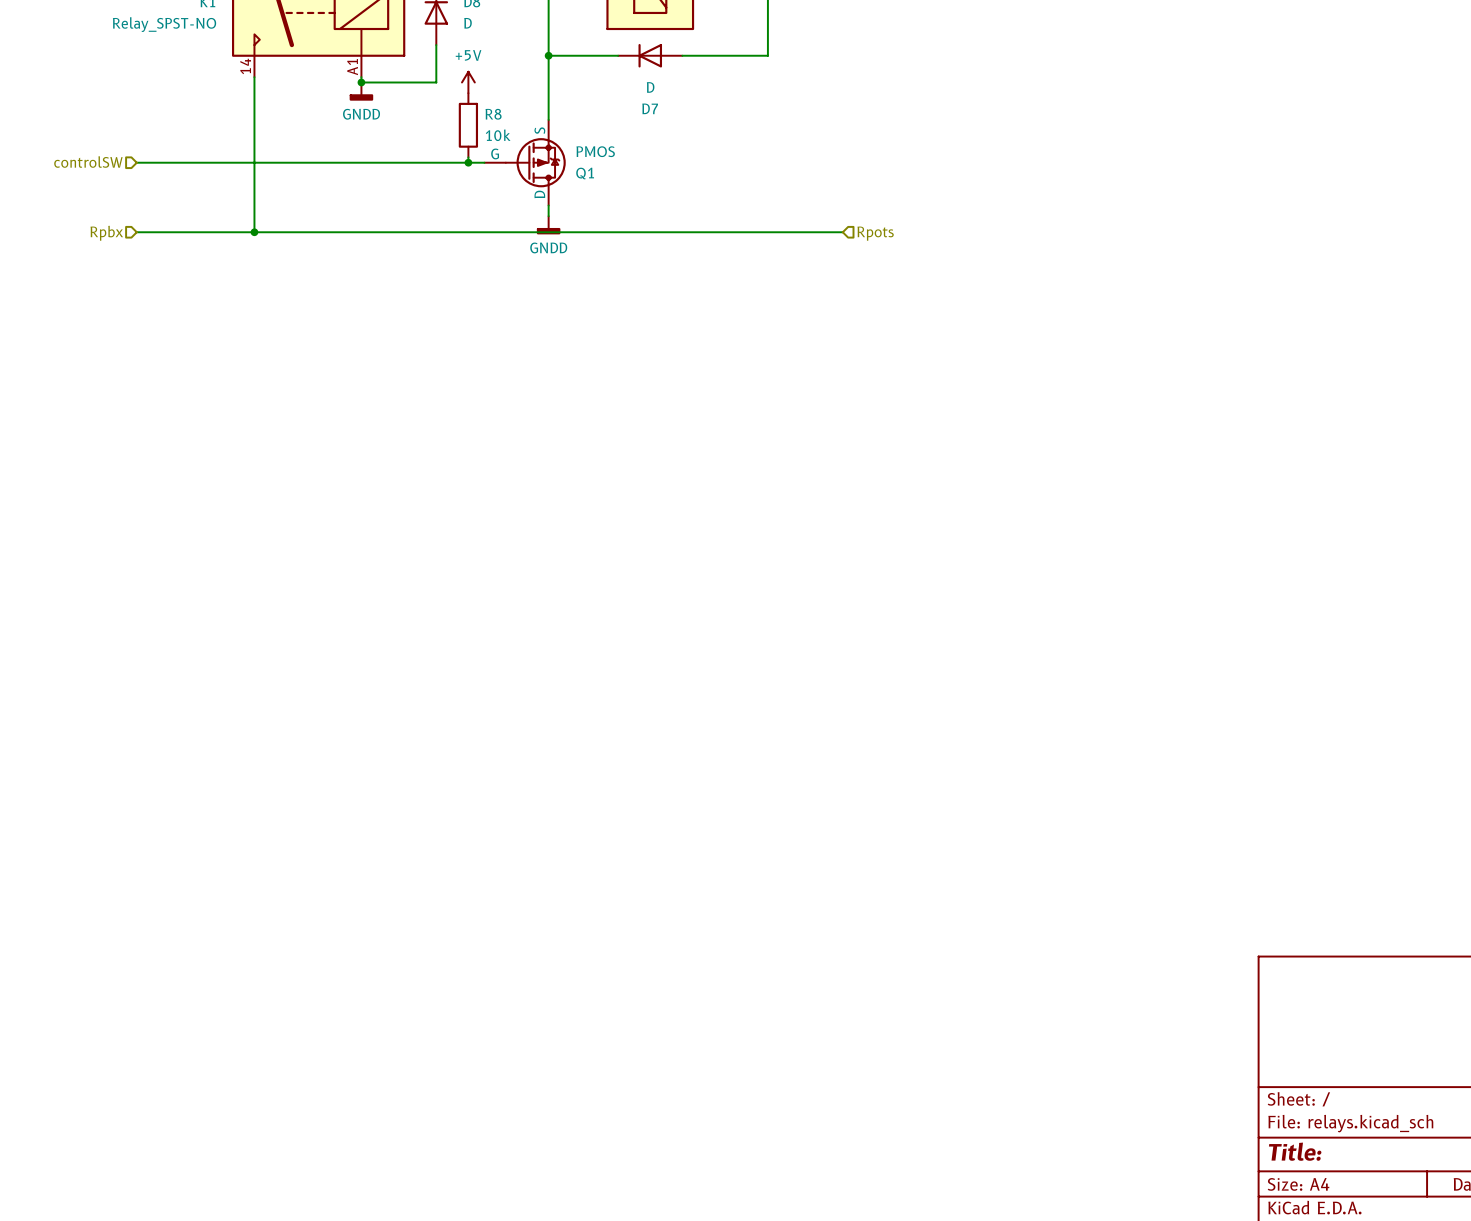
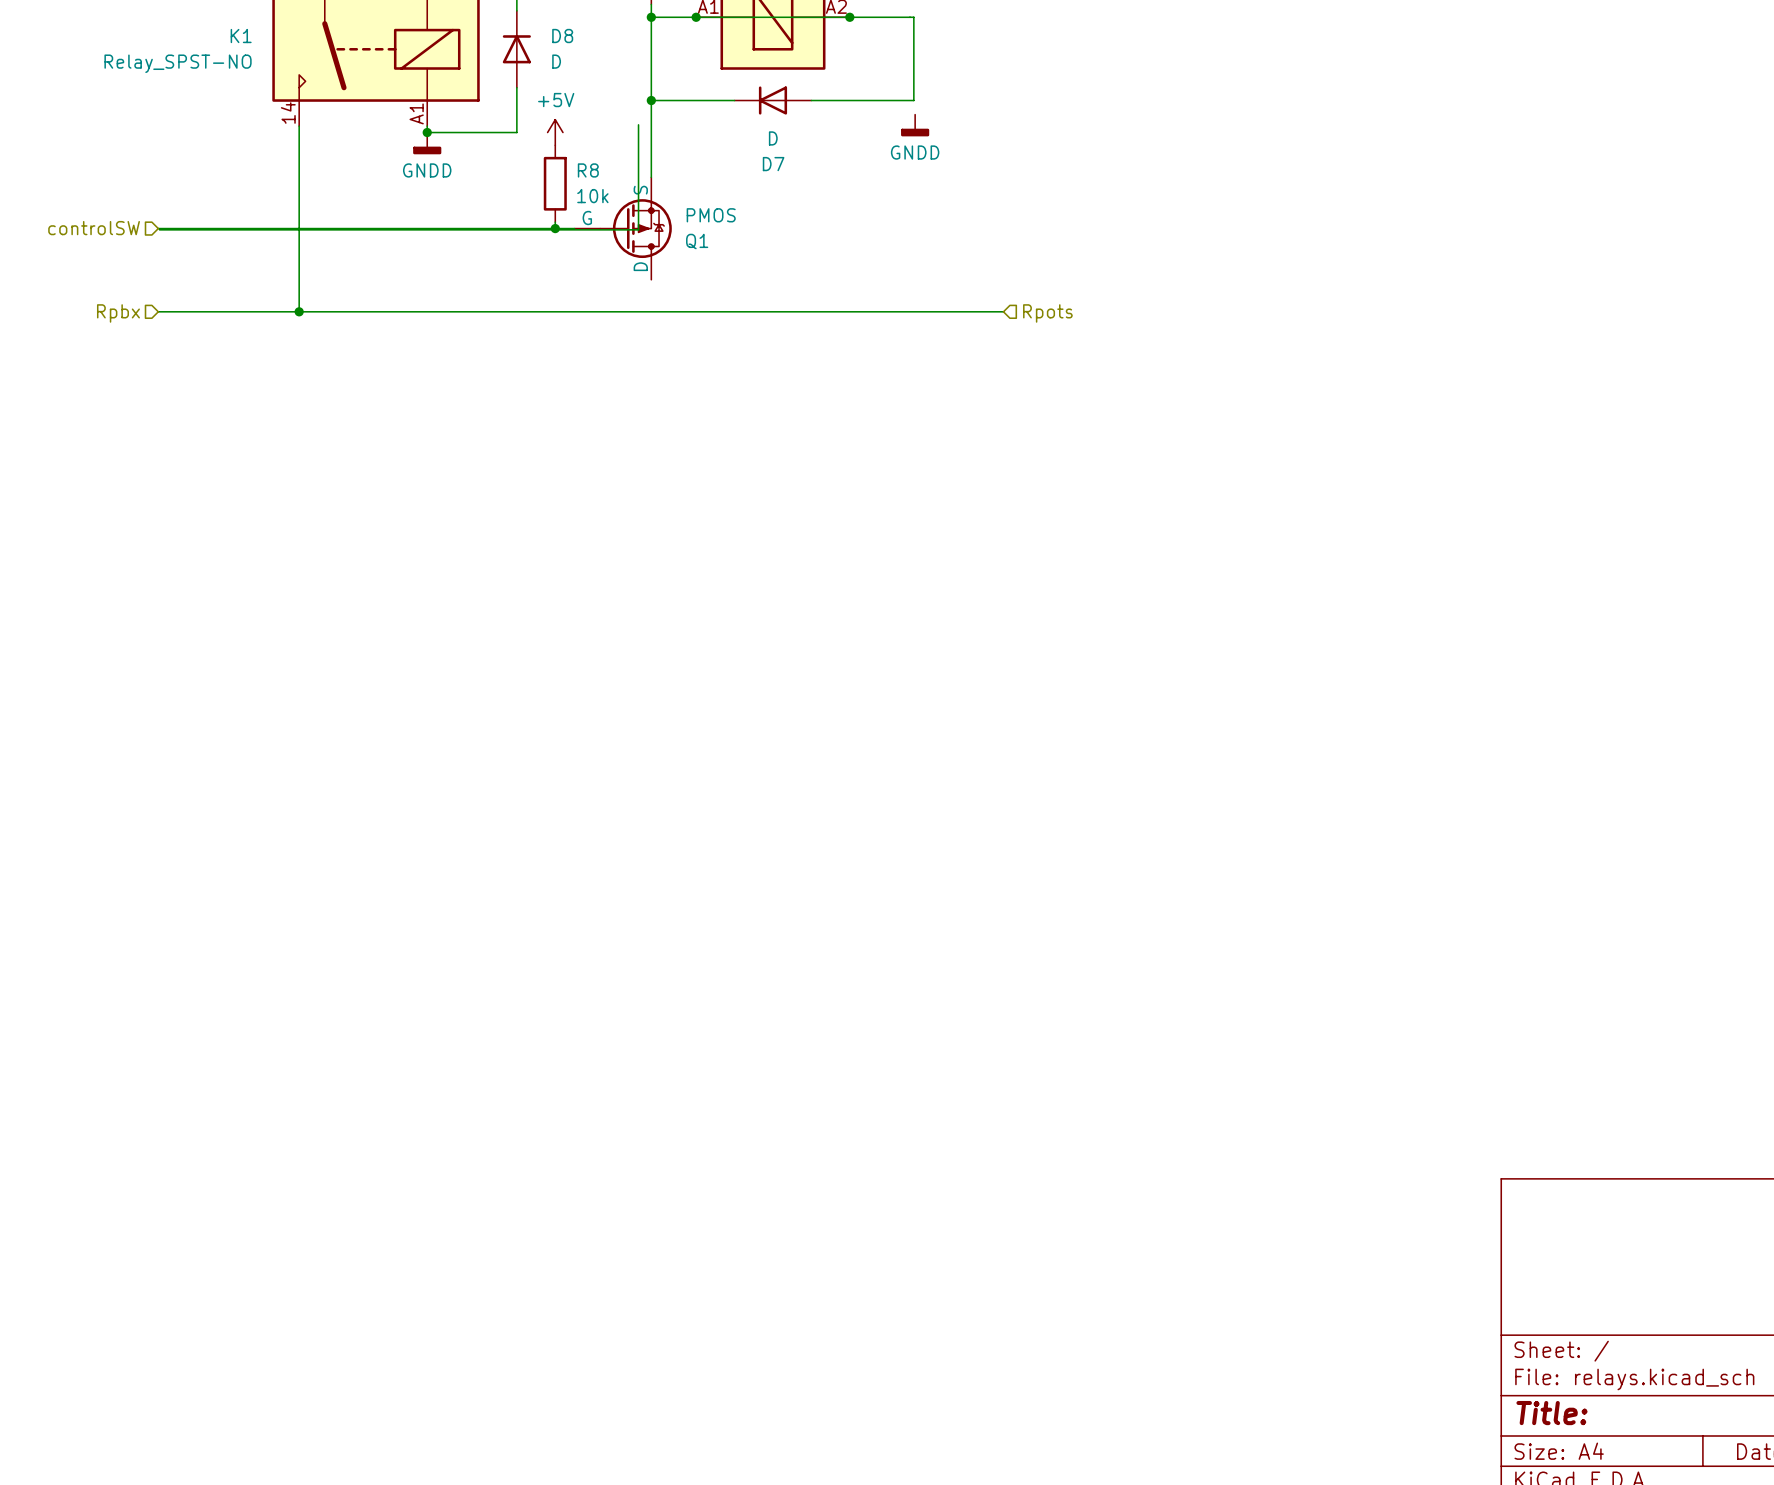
wire: none -> (638, 124) (638, 229) (159, 229)
power symbol: none -> GNDD (915, 125)
wire: (548, 205) (548, 216) -> none
power symbol: GNDD (548, 225) -> none

